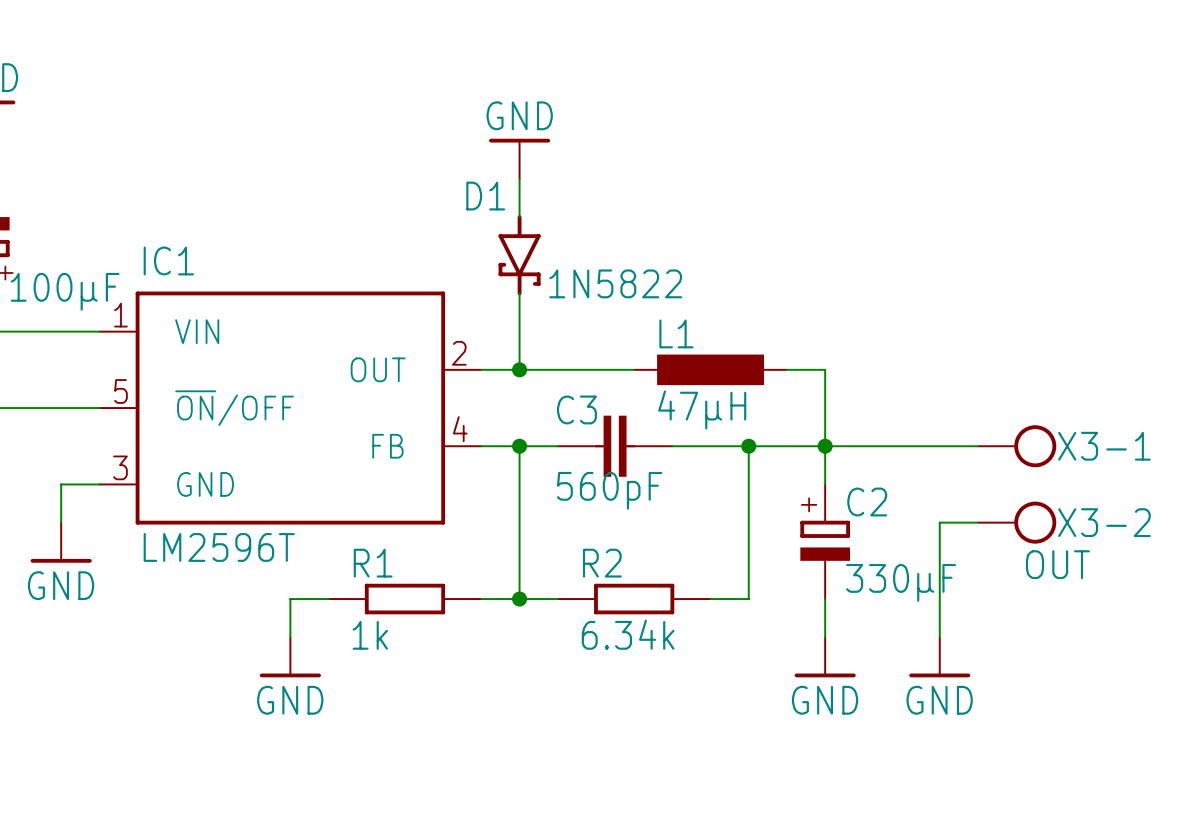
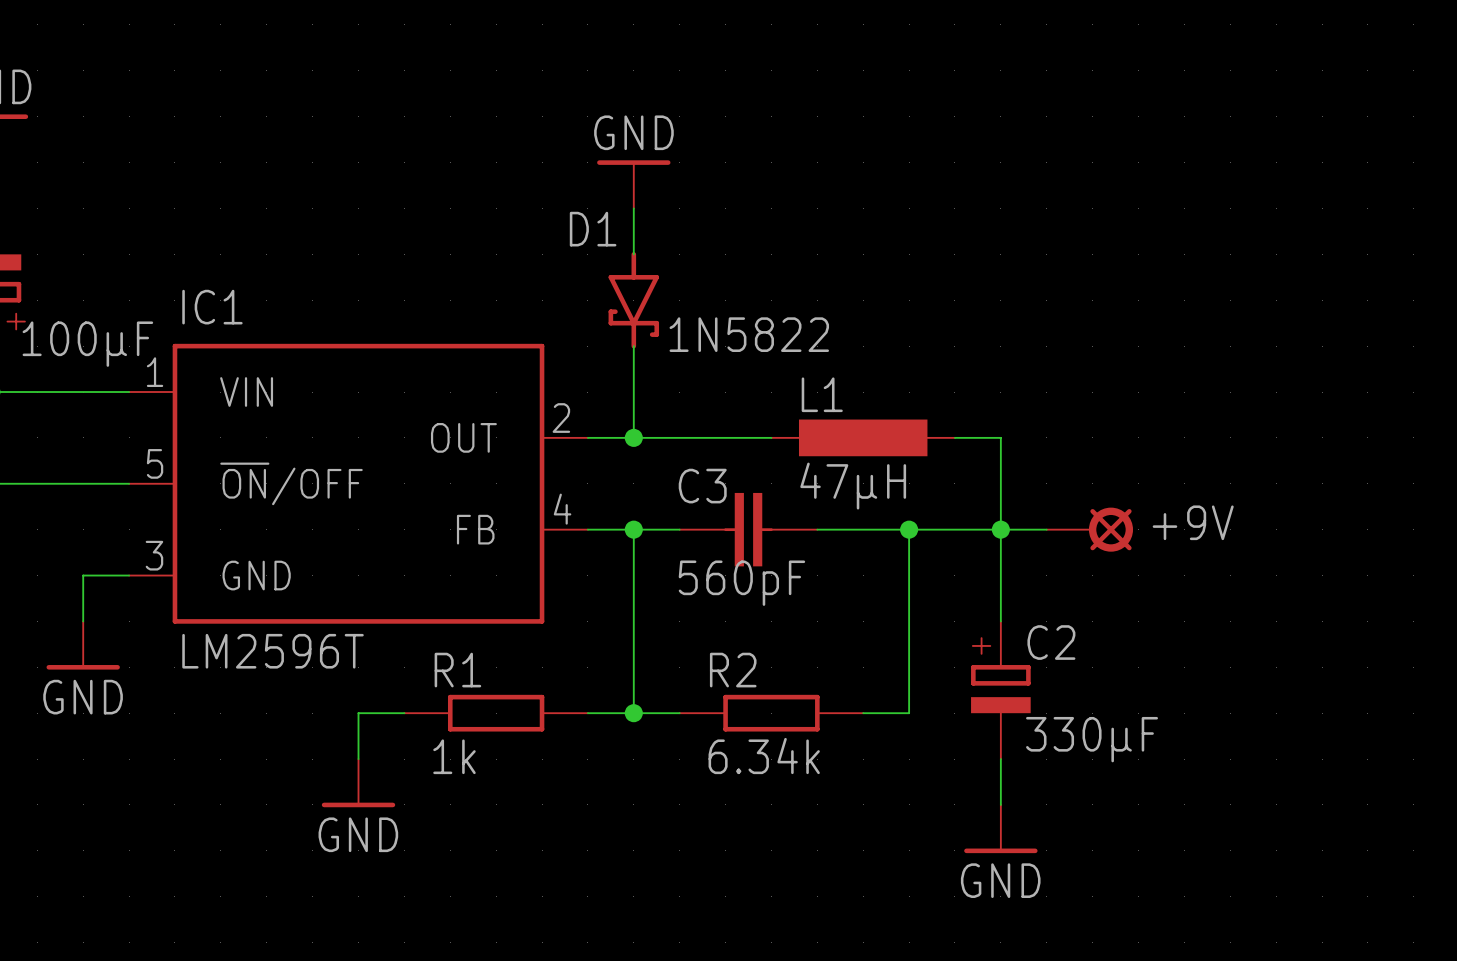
wire: (863, 446) (977, 446) -> none
+9V: none -> (1089, 529)
X3-1: (1017, 446) -> none
wire: (977, 522) (939, 522) (939, 637) -> none
X3-2: OUT (1017, 522) -> none
C2 position: (825, 541) -> (1000, 690)
power symbol position: GND (825, 657) -> GND (1000, 829)
power symbol: GND (939, 657) -> none

